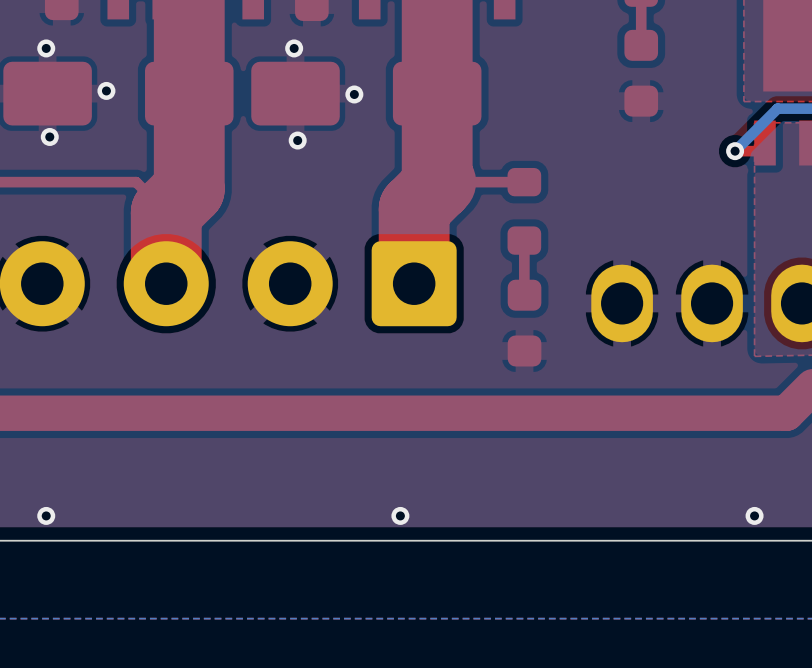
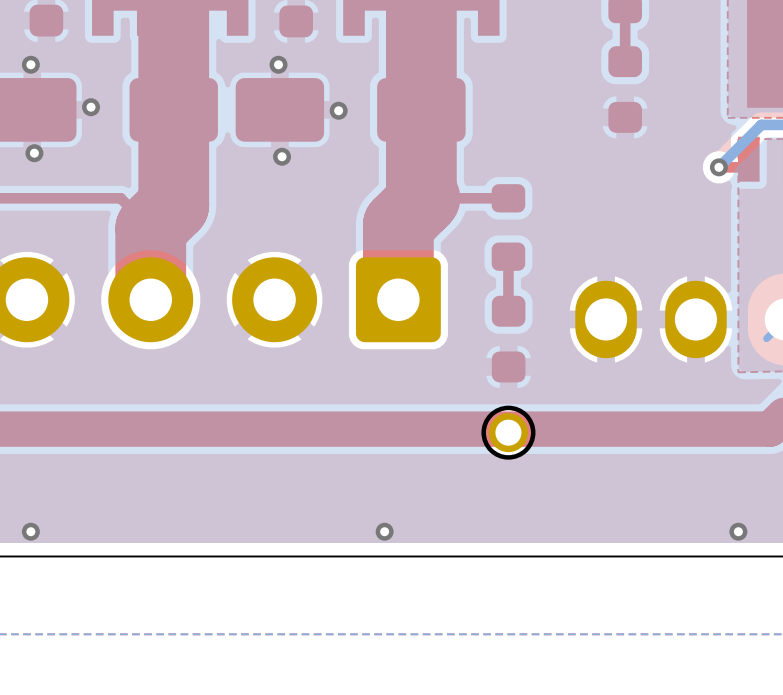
part: none -> (508, 432)

